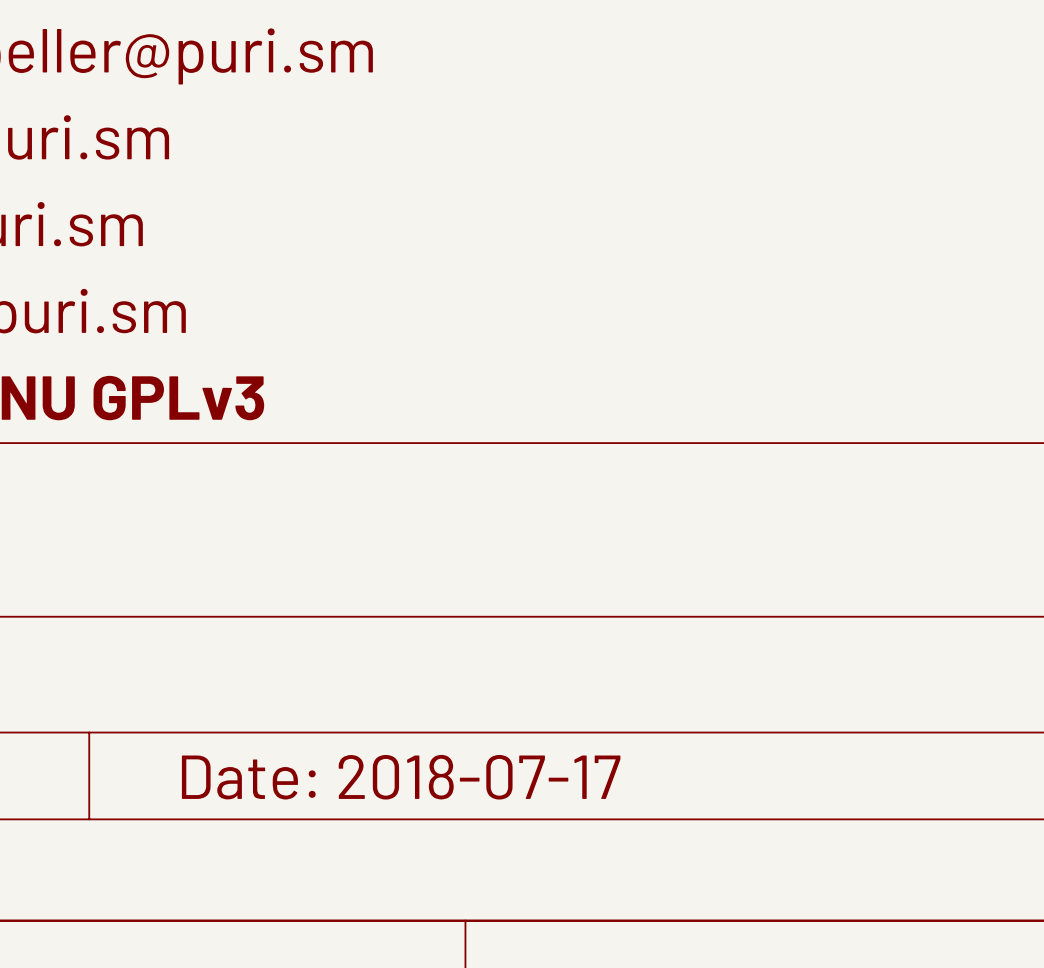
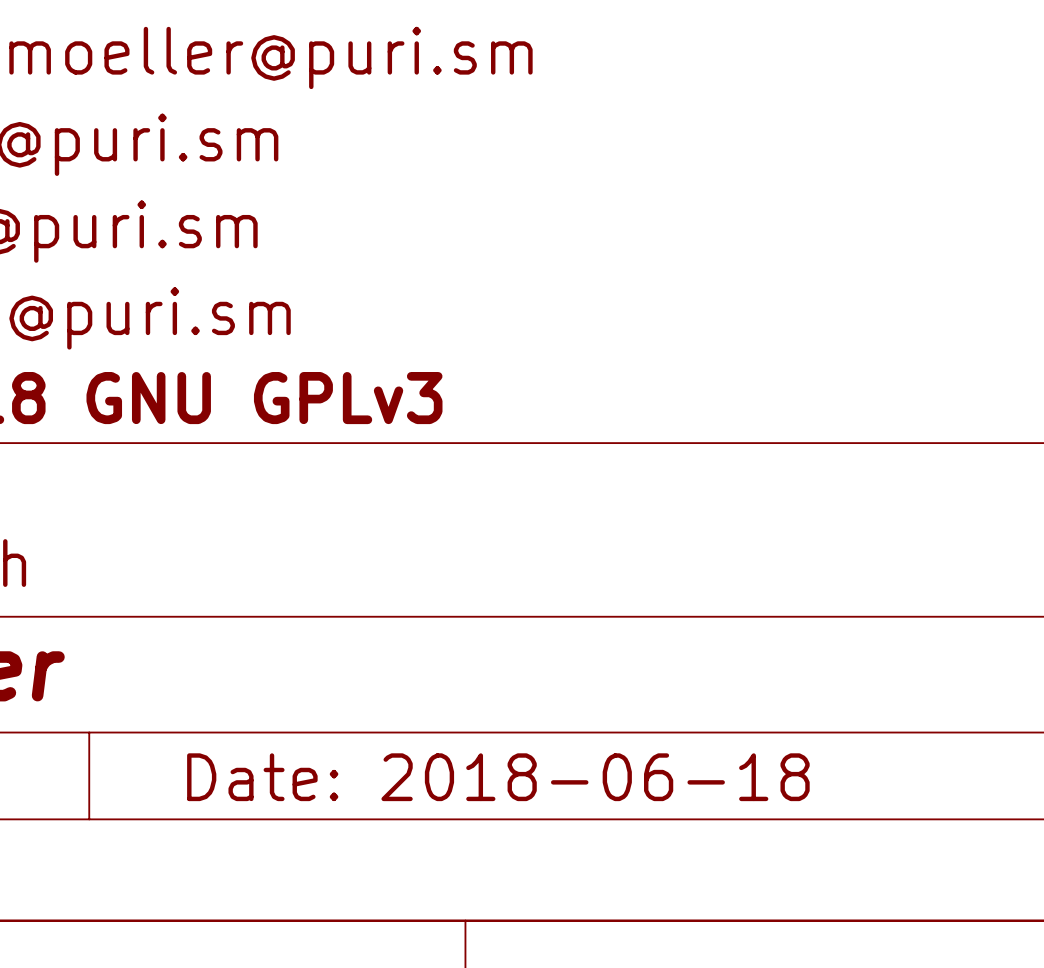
title block: Date: 2018-07-17 (401, 777) -> Date: 2018-06-18 (498, 777)

